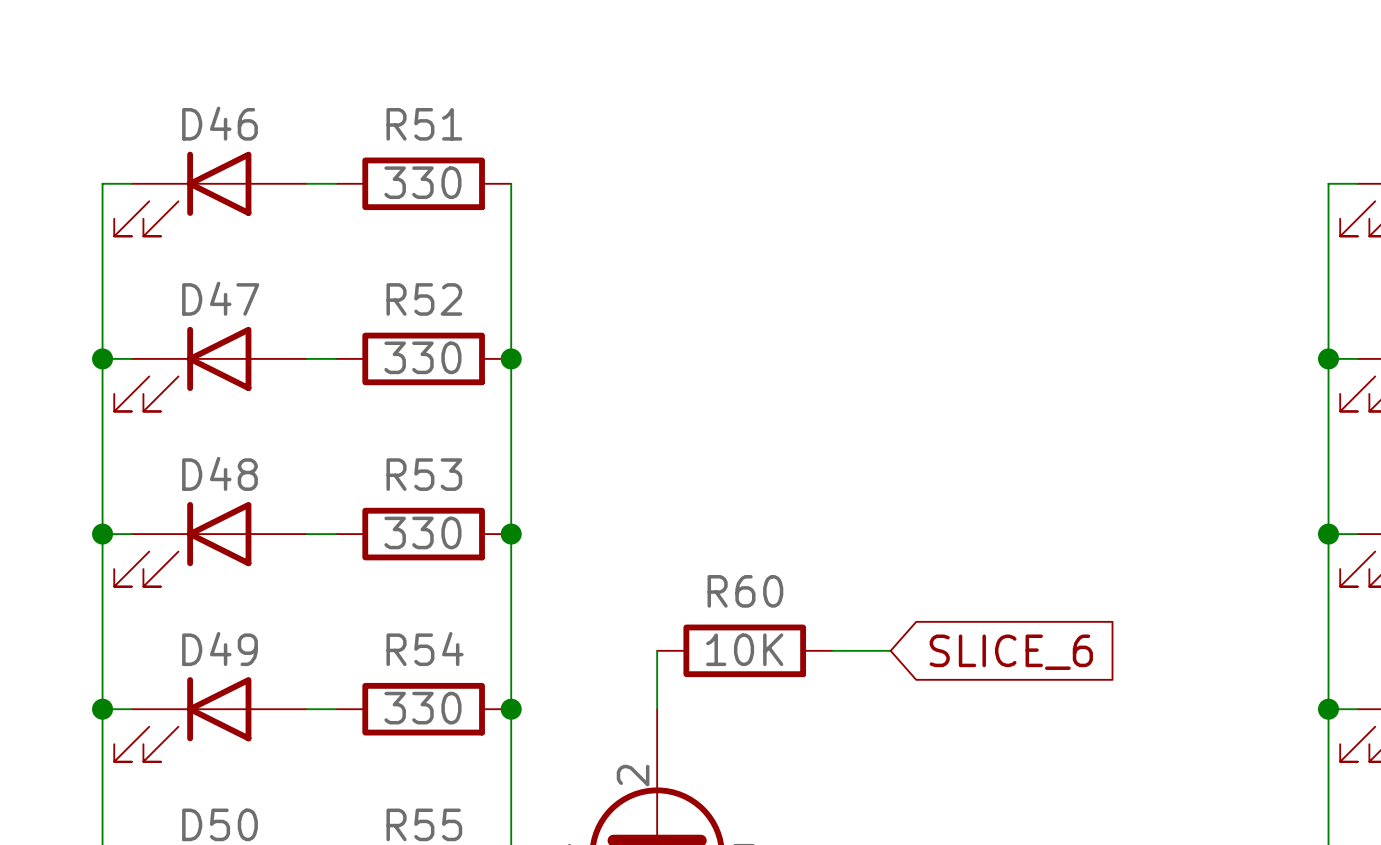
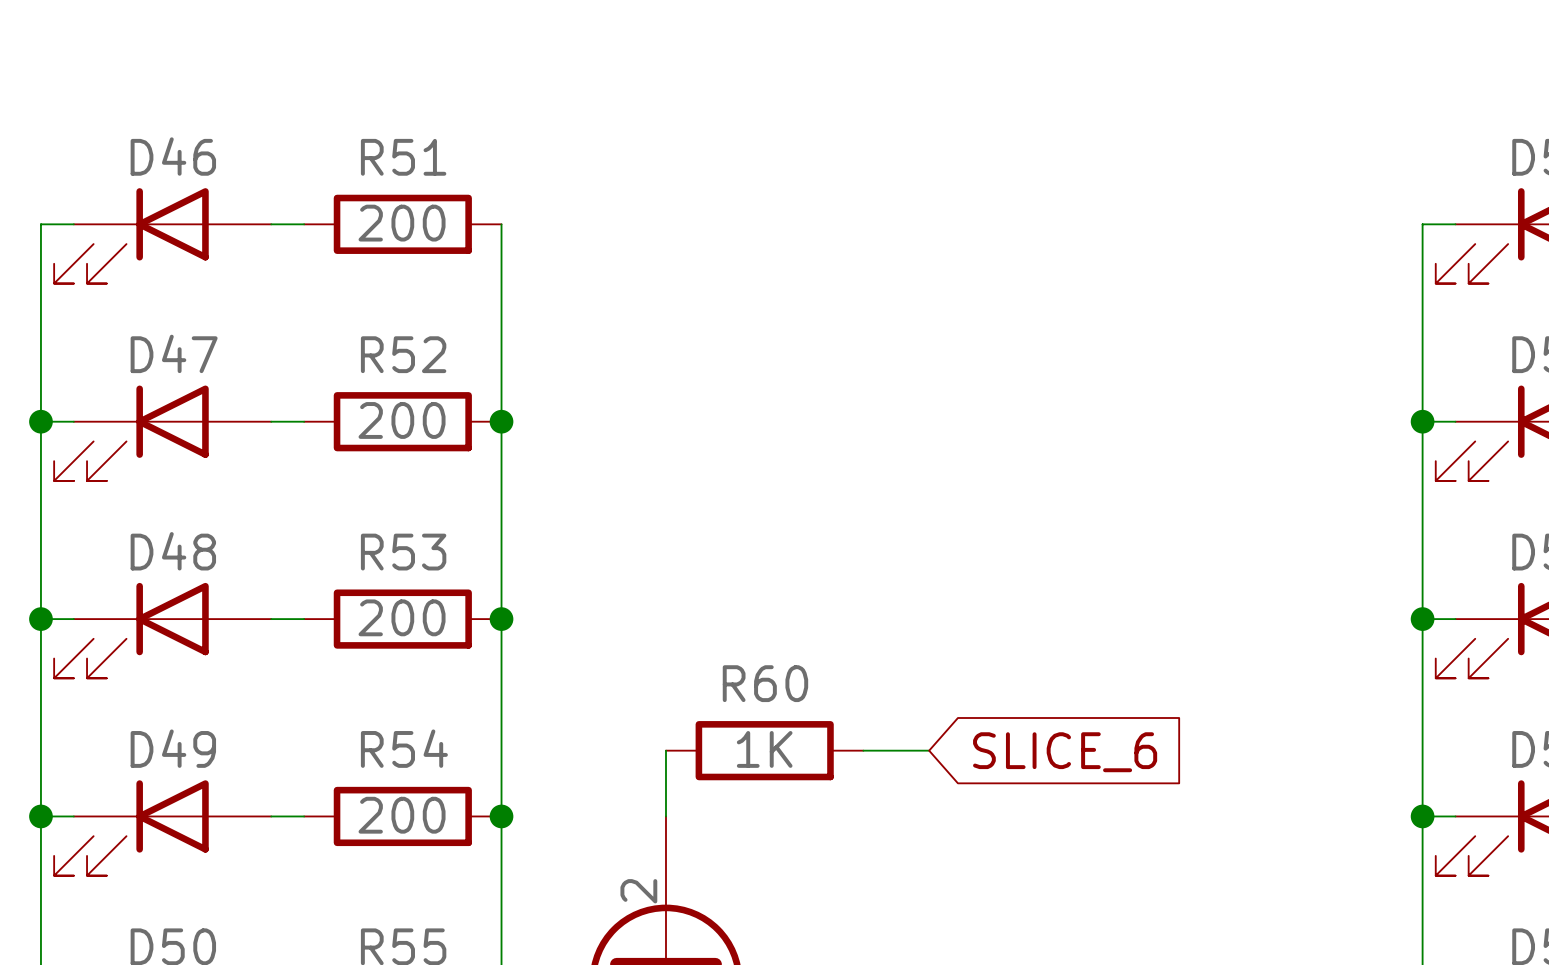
R51 value: 330 (422, 182) -> 200 (402, 223)
R52 value: 330 (422, 357) -> 200 (402, 420)
R53 value: 330 (422, 532) -> 200 (402, 617)
R60 value: 10K (744, 649) -> 1K (764, 749)
R54 value: 330 (422, 708) -> 200 (402, 815)

